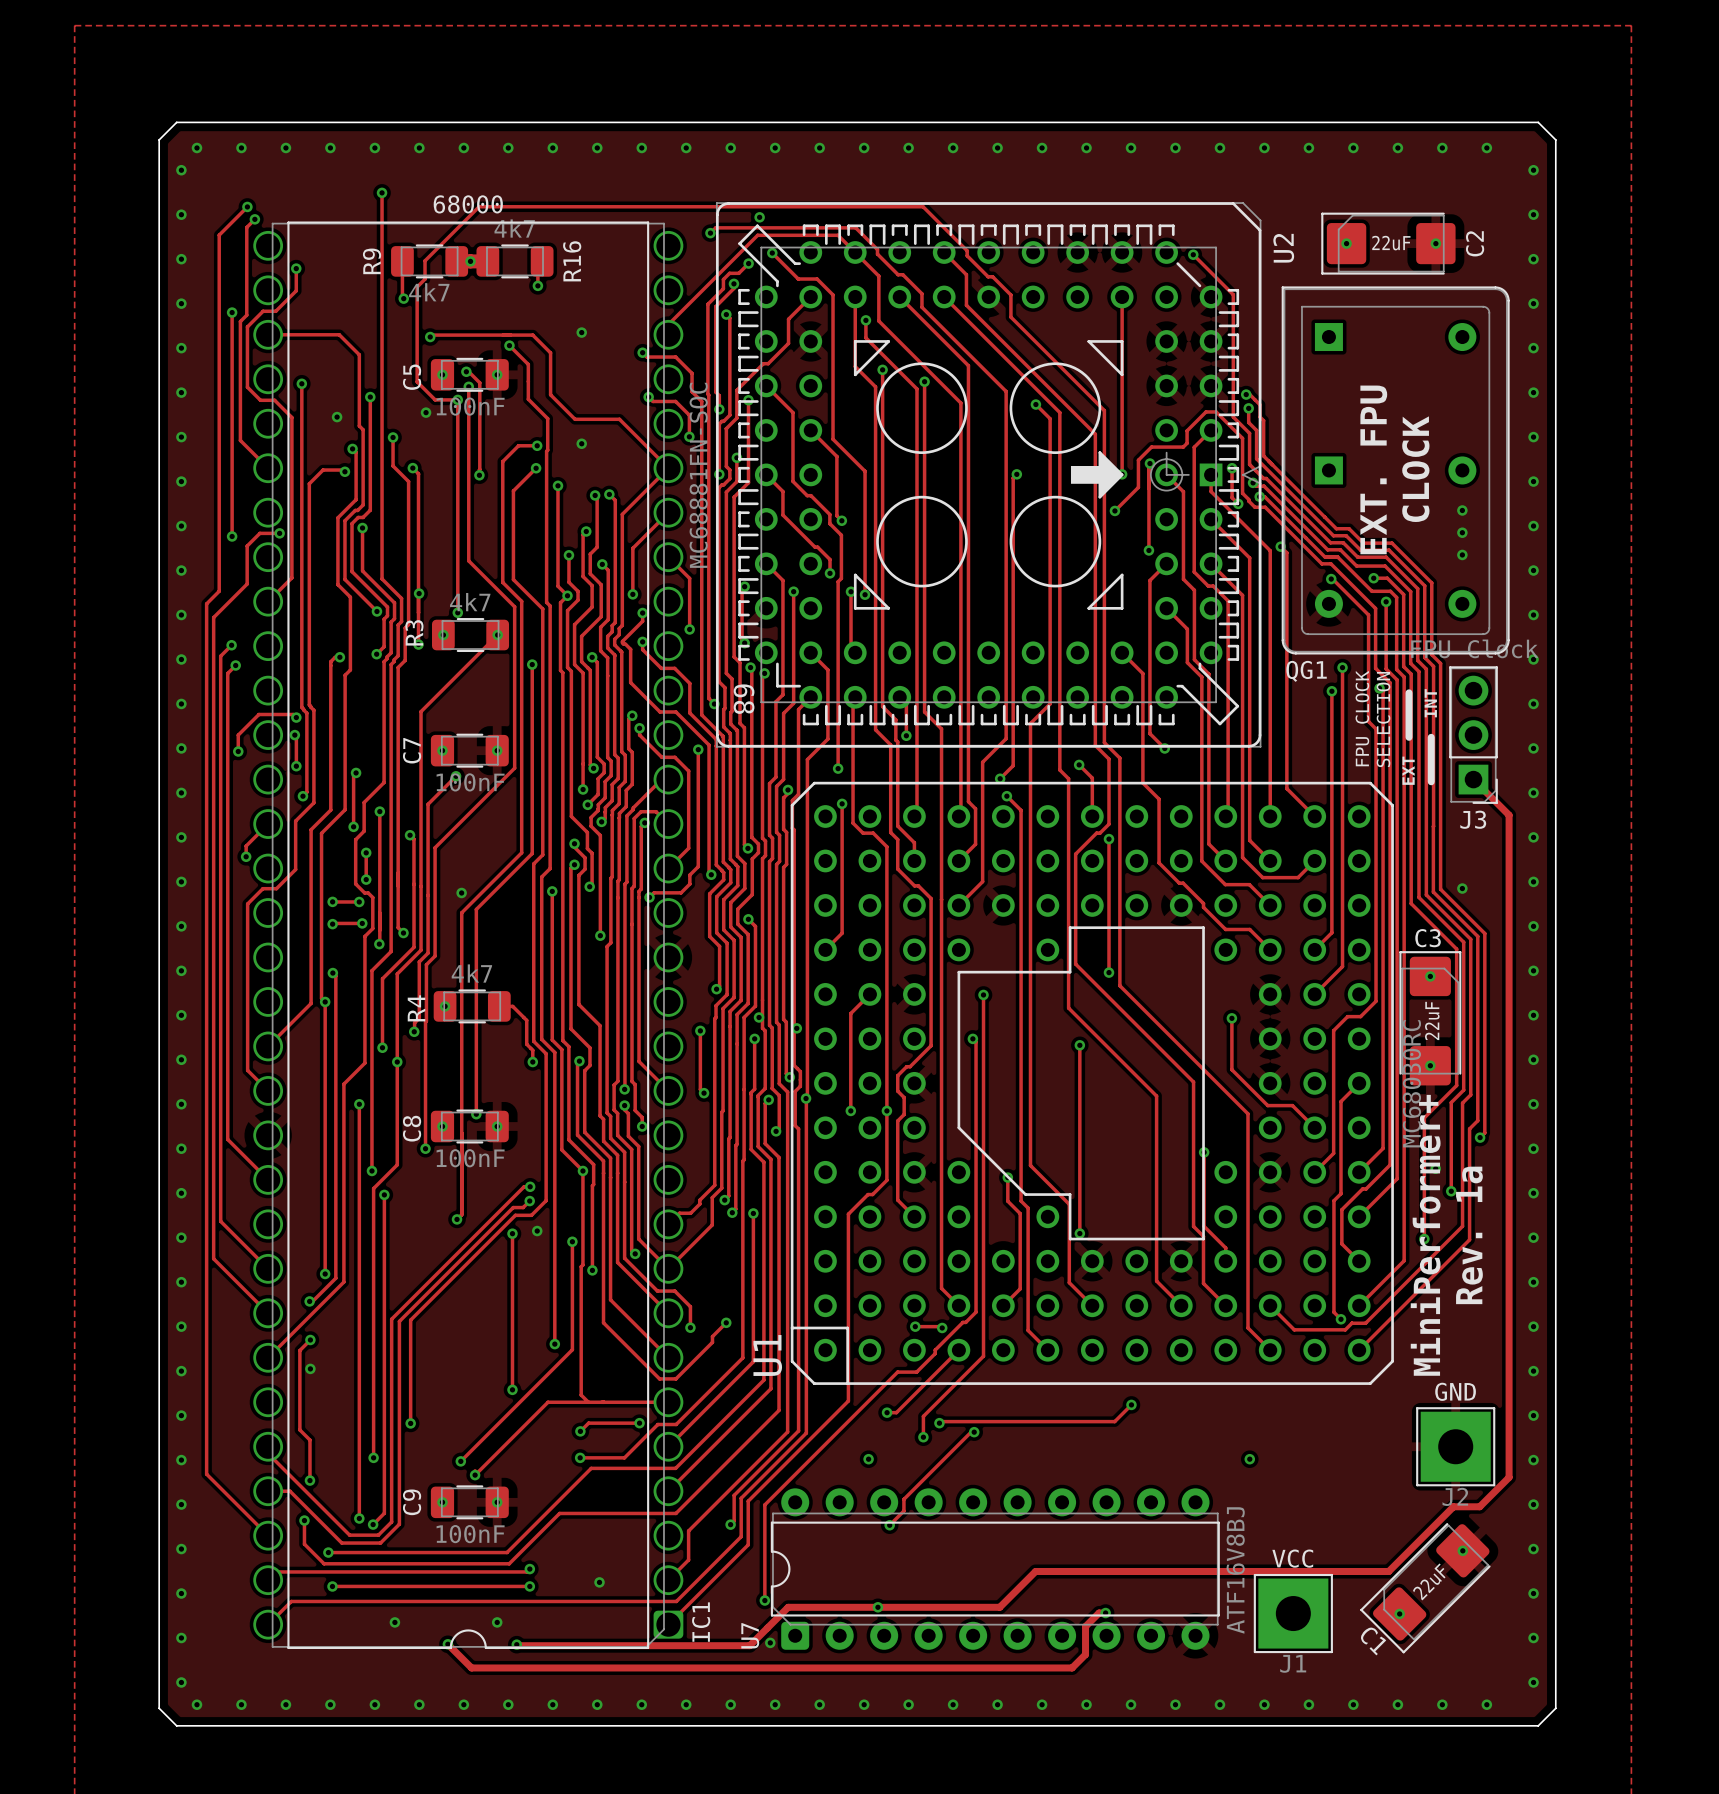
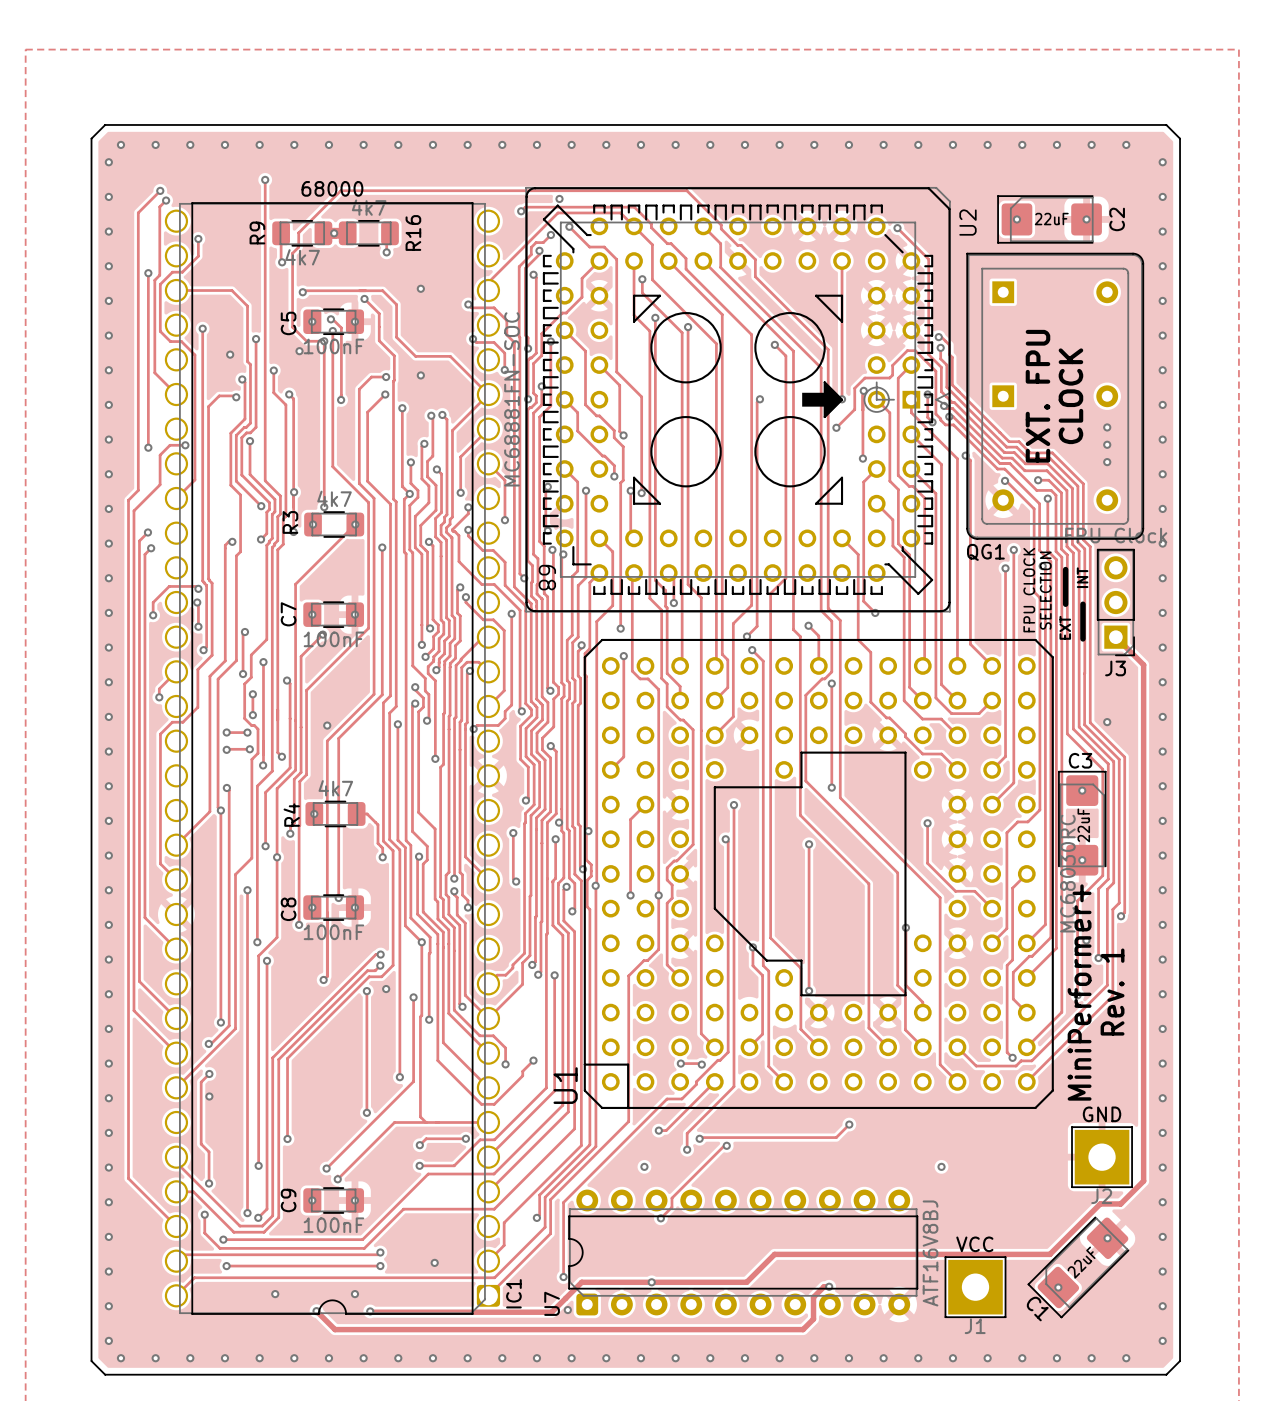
text: Rev. 1a (1469, 1235) -> Rev. 1 (1112, 992)

